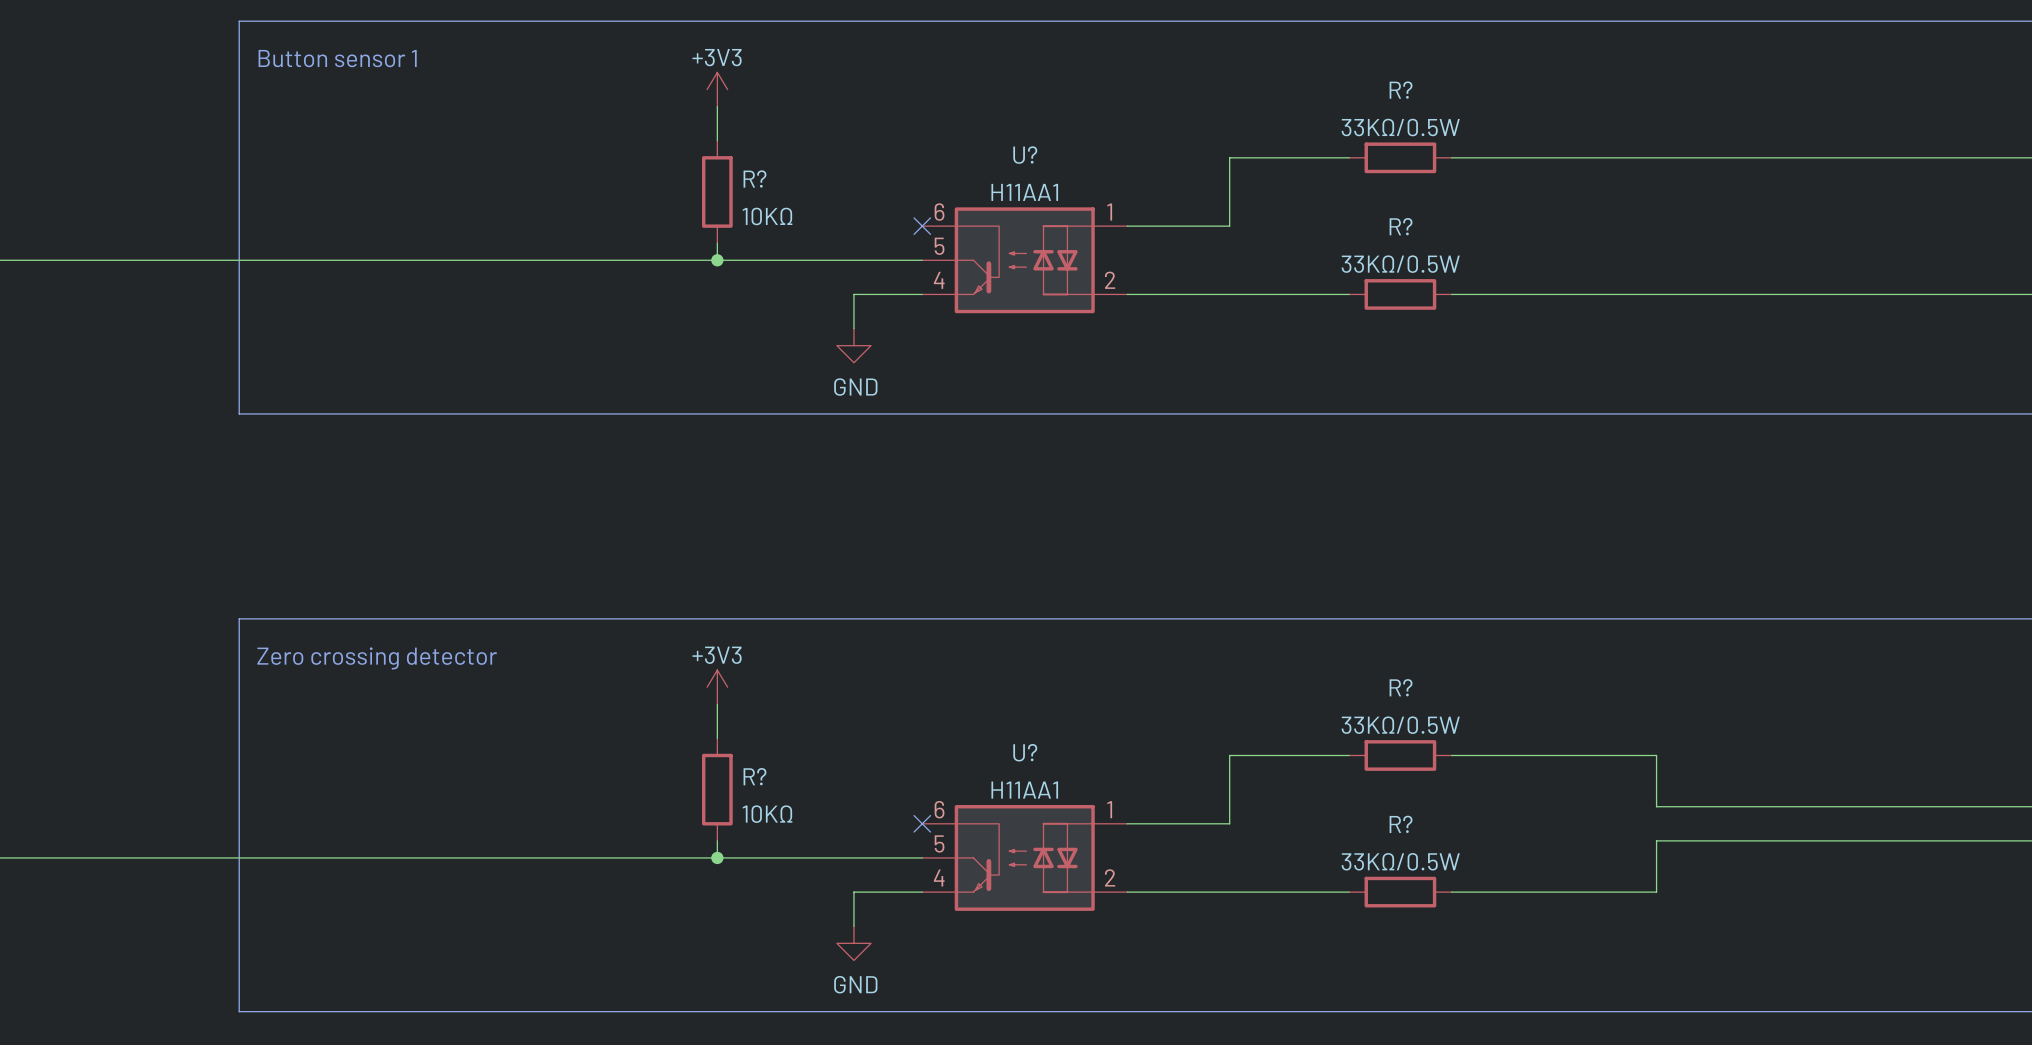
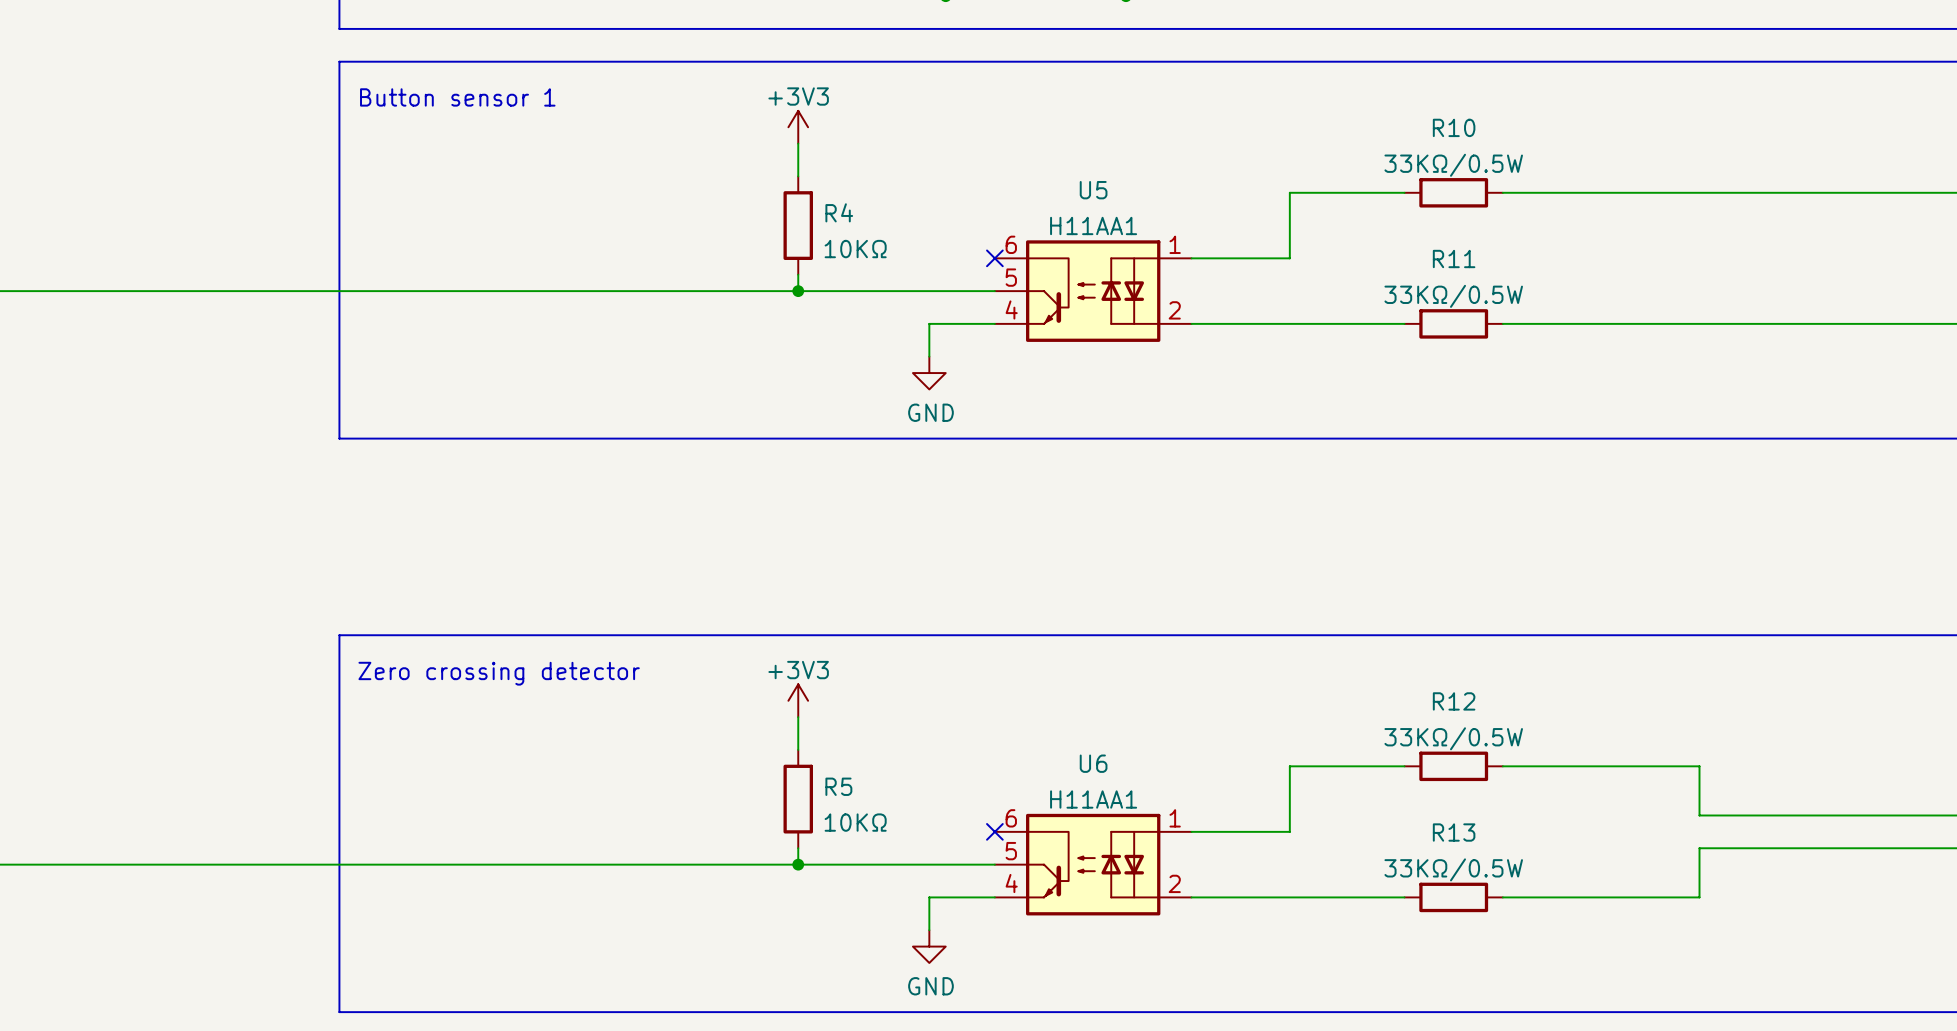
R? name: R? (1401, 90) -> R10 (1454, 127)
U? name: U? (1025, 155) -> U5 (1093, 190)
R? name: R? (754, 179) -> R4 (839, 212)
R? name: R? (1401, 226) -> R11 (1454, 258)
R? name: R? (1401, 687) -> R12 (1454, 701)
U? name: U? (1025, 752) -> U6 (1093, 763)
R? name: R? (754, 776) -> R5 (838, 786)
R? name: R? (1401, 824) -> R13 (1454, 832)

